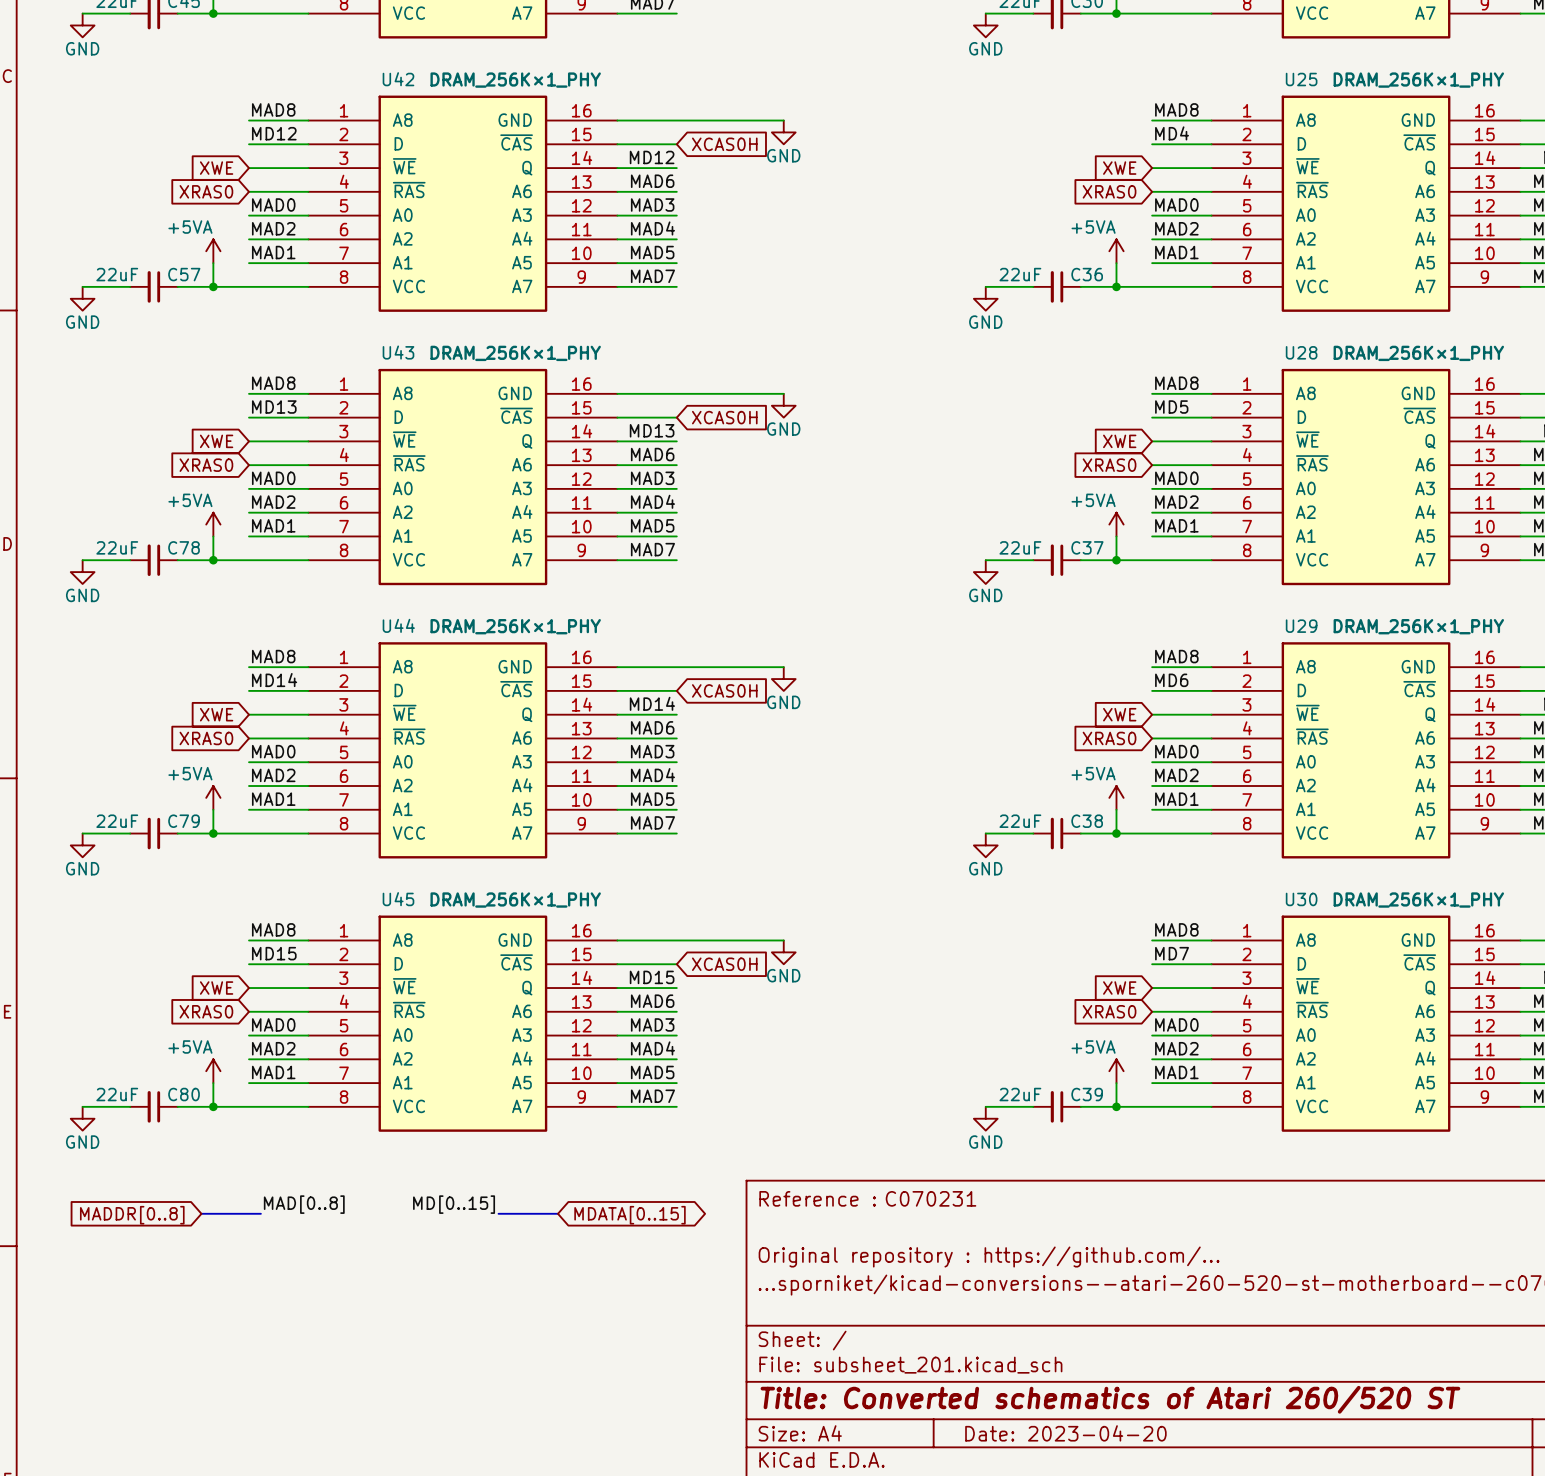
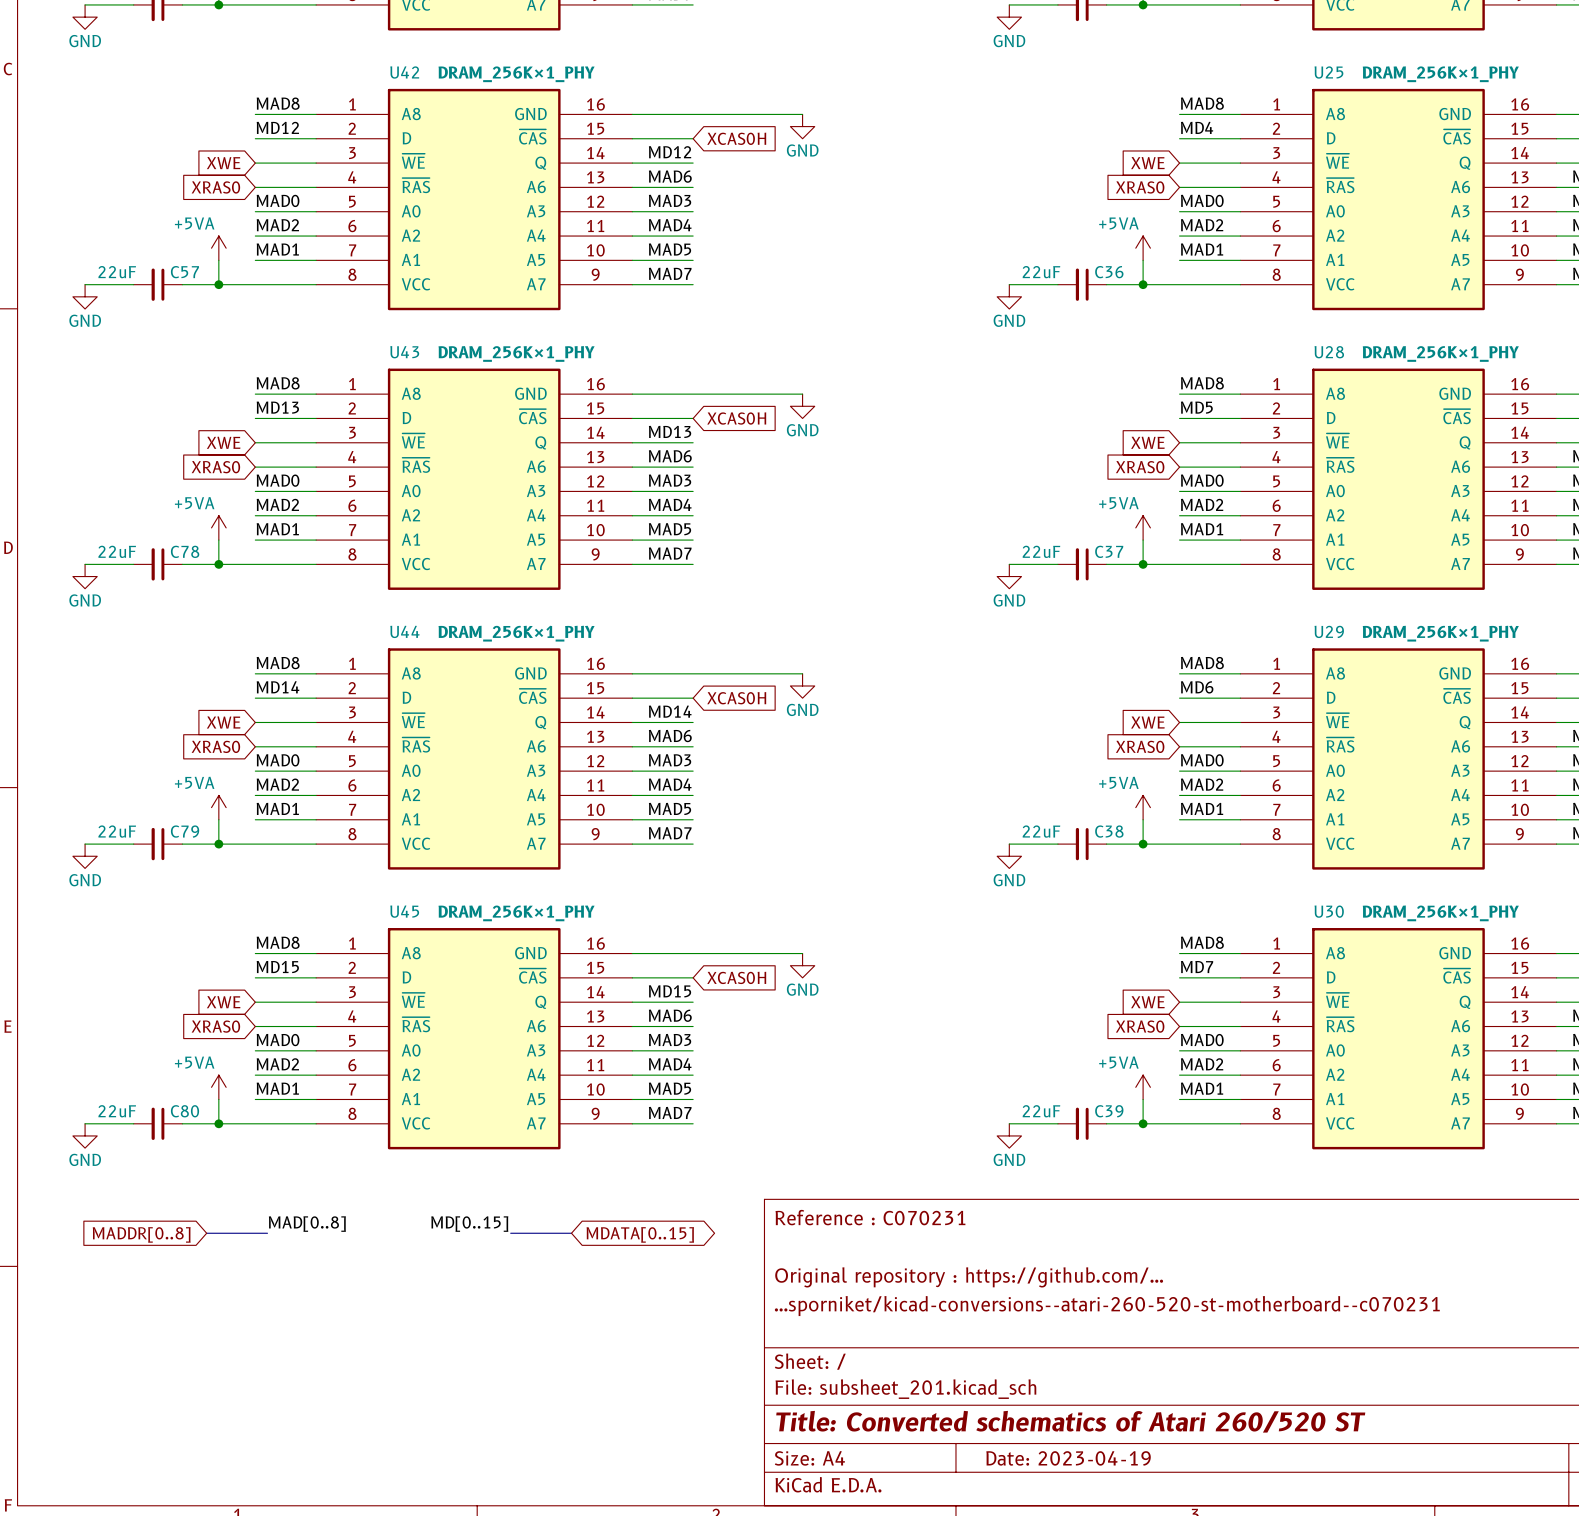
title block: Date: 2023-04-20 (1065, 1433) -> Date: 2023-04-19 (1068, 1458)

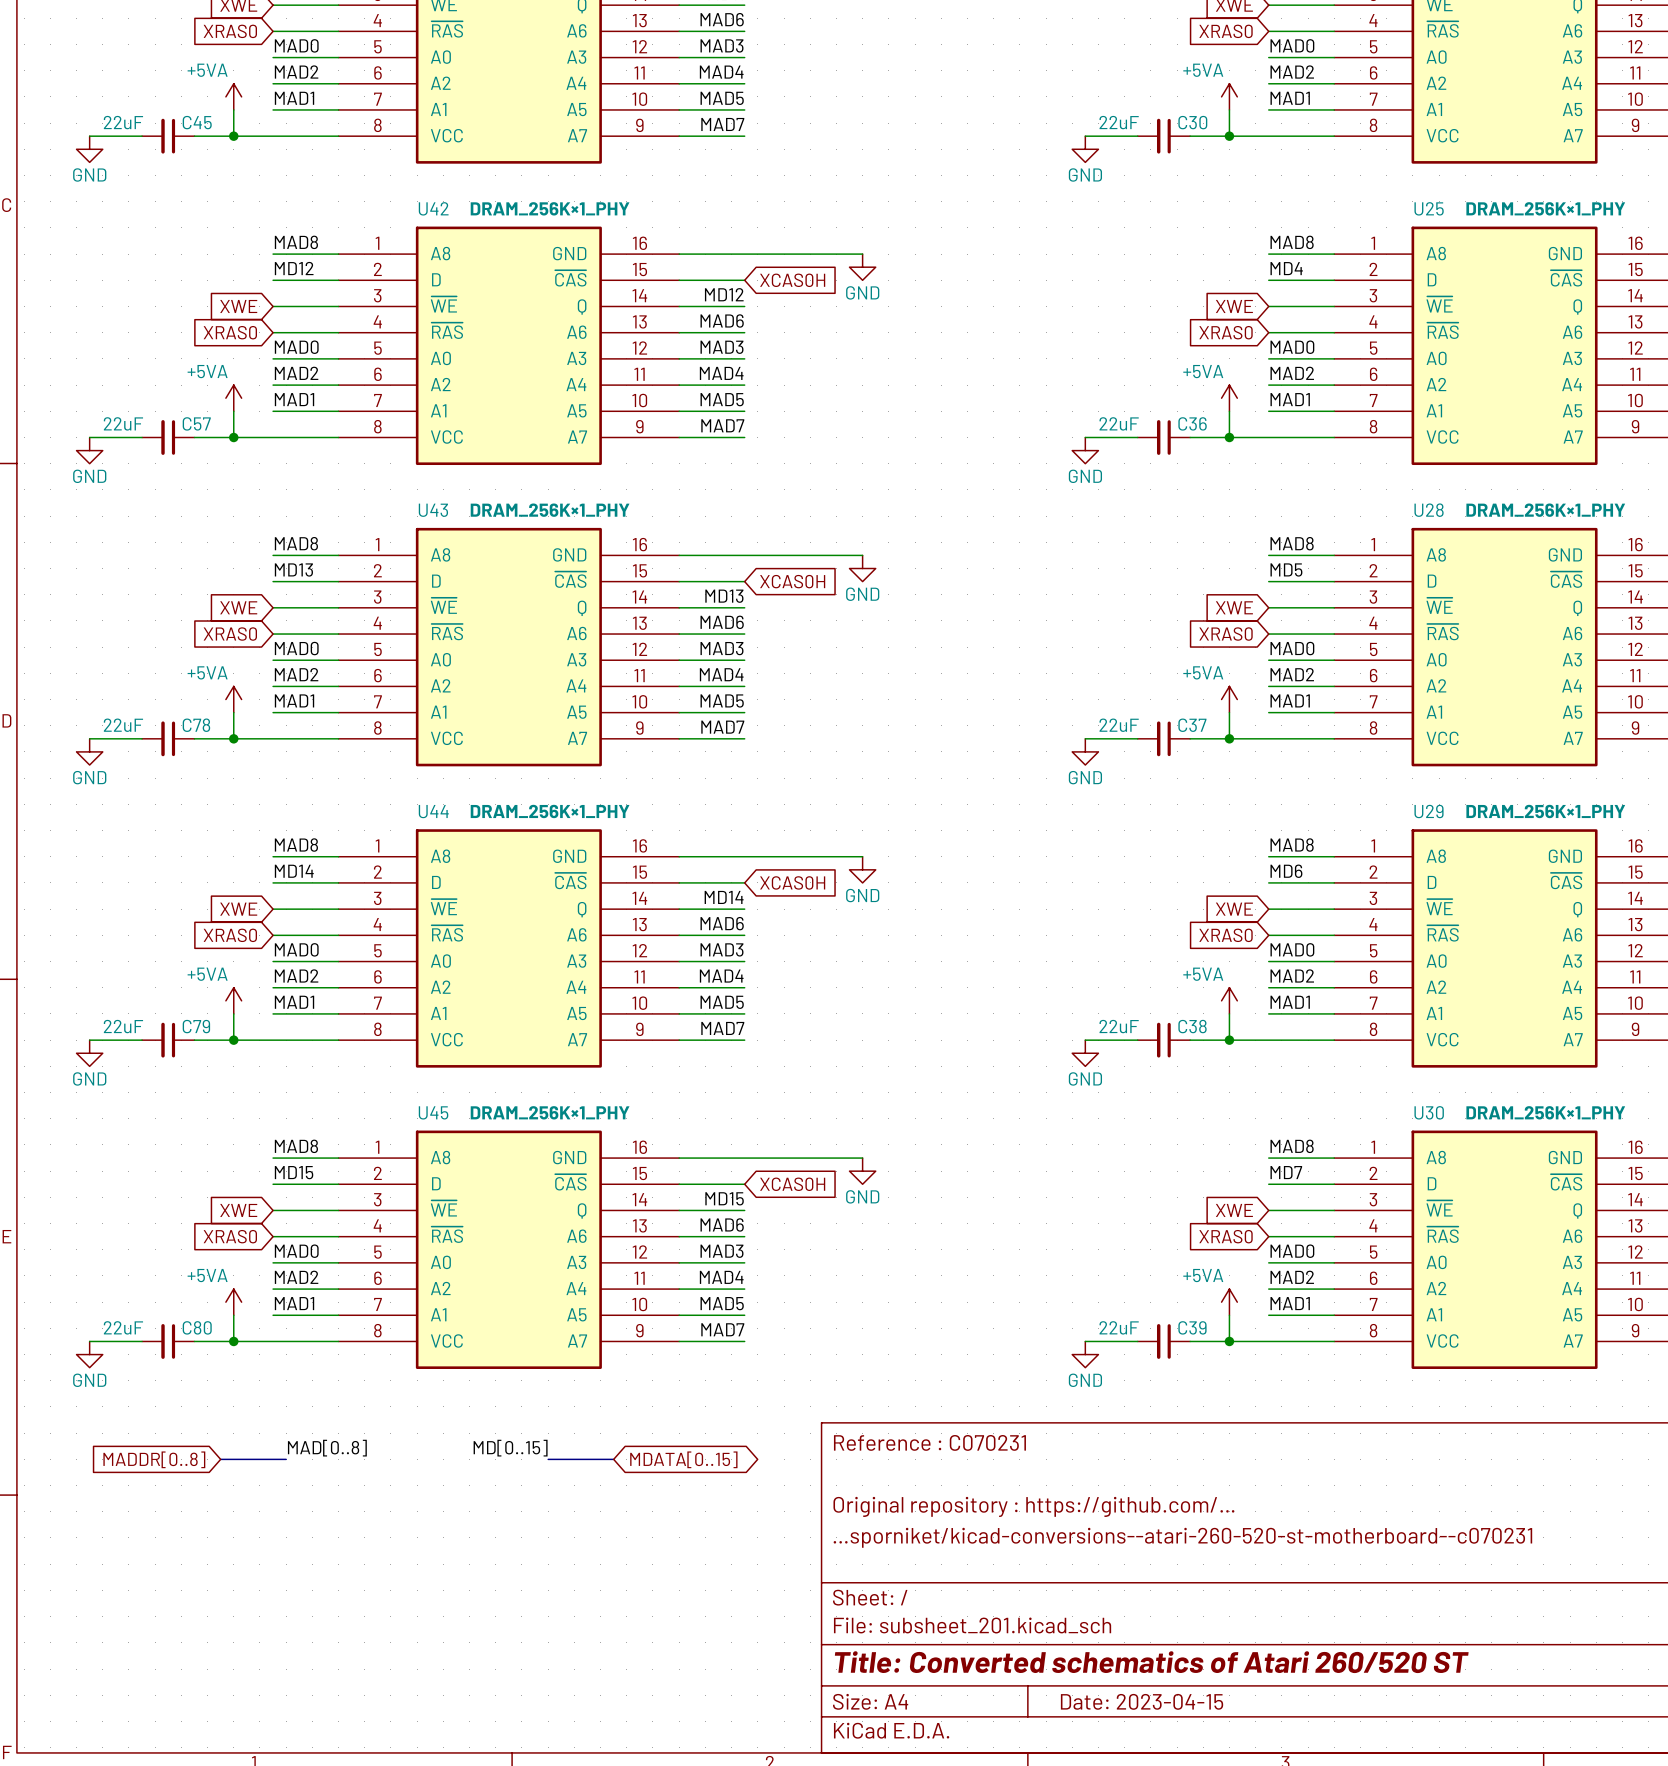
title block: Date: 2023-04-19 (1068, 1458) -> Date: 2023-04-15 (1142, 1701)

